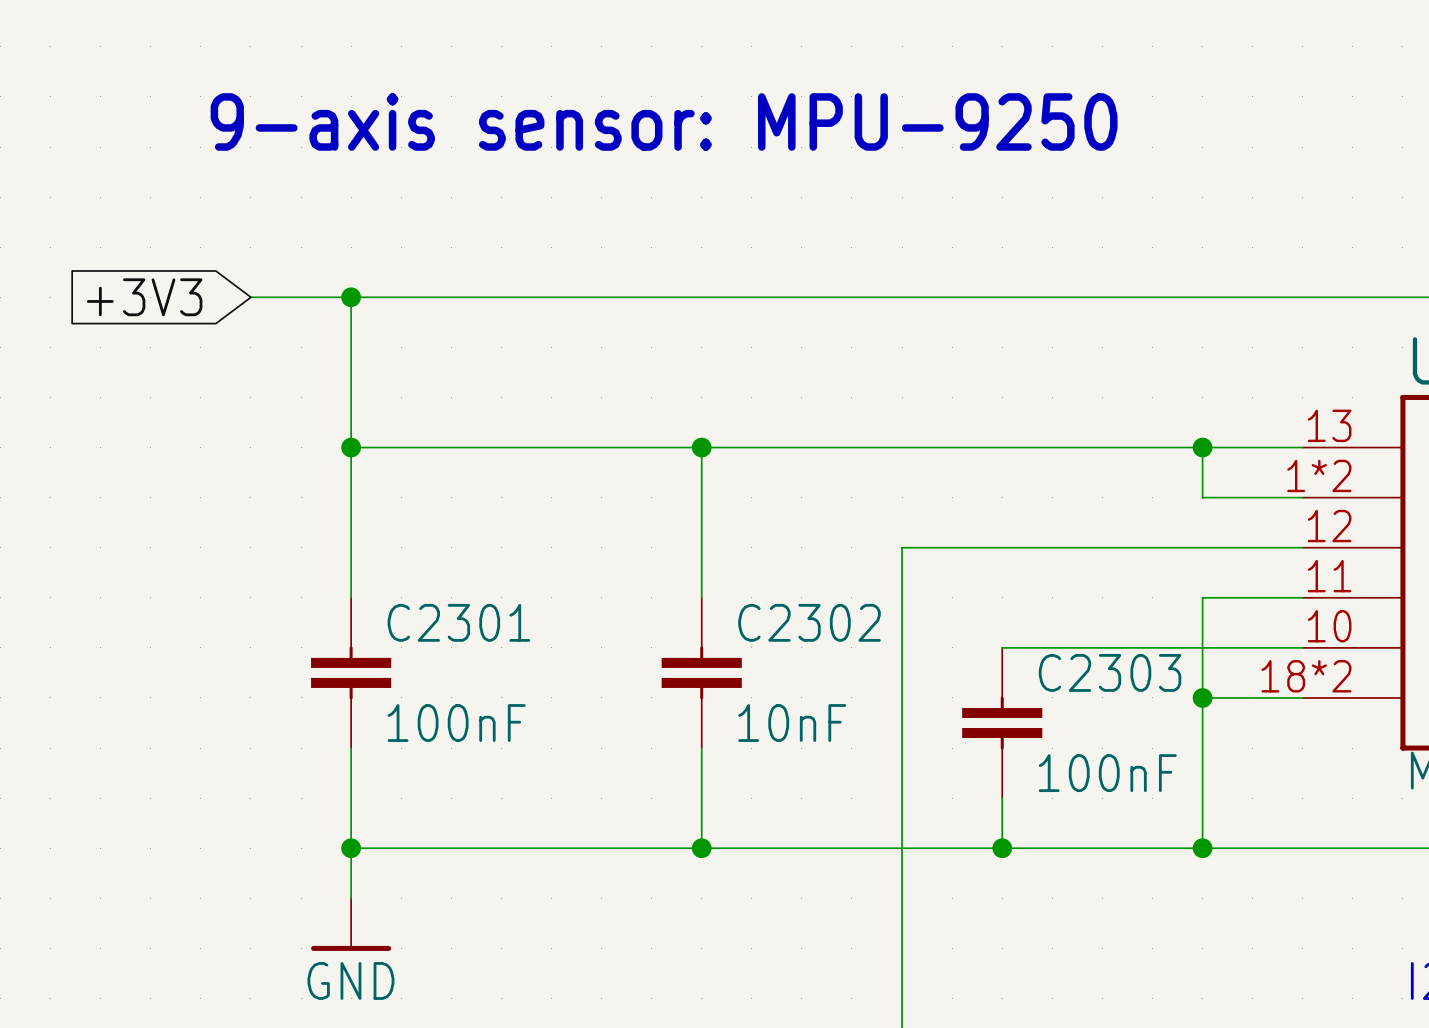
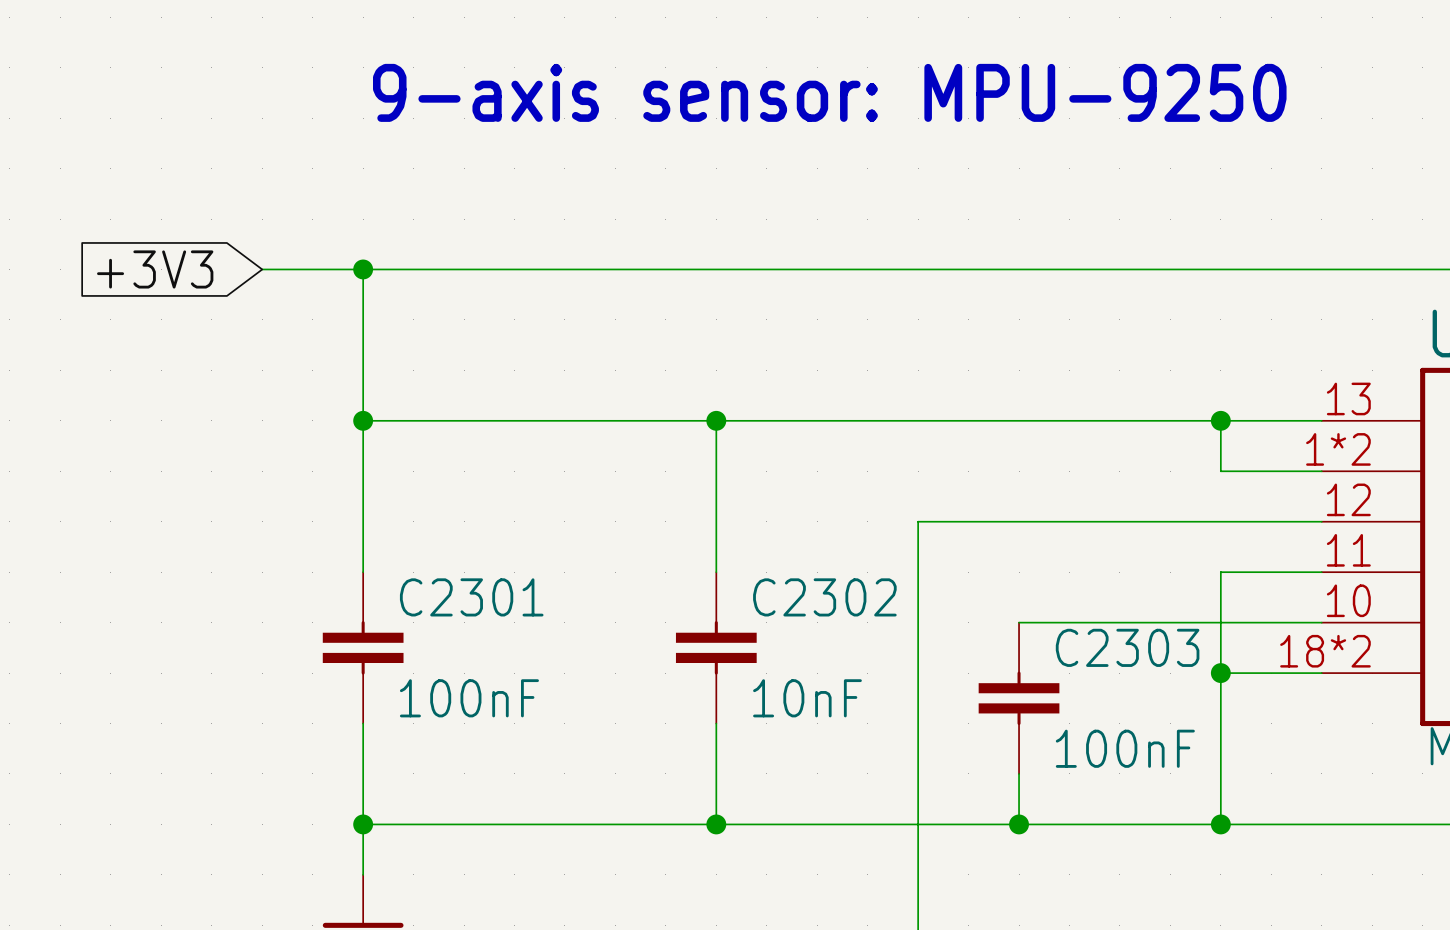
text position: 9-axis sensor: MPU-9250 (664, 121) -> 9-axis sensor: MPU-9250 (829, 92)

